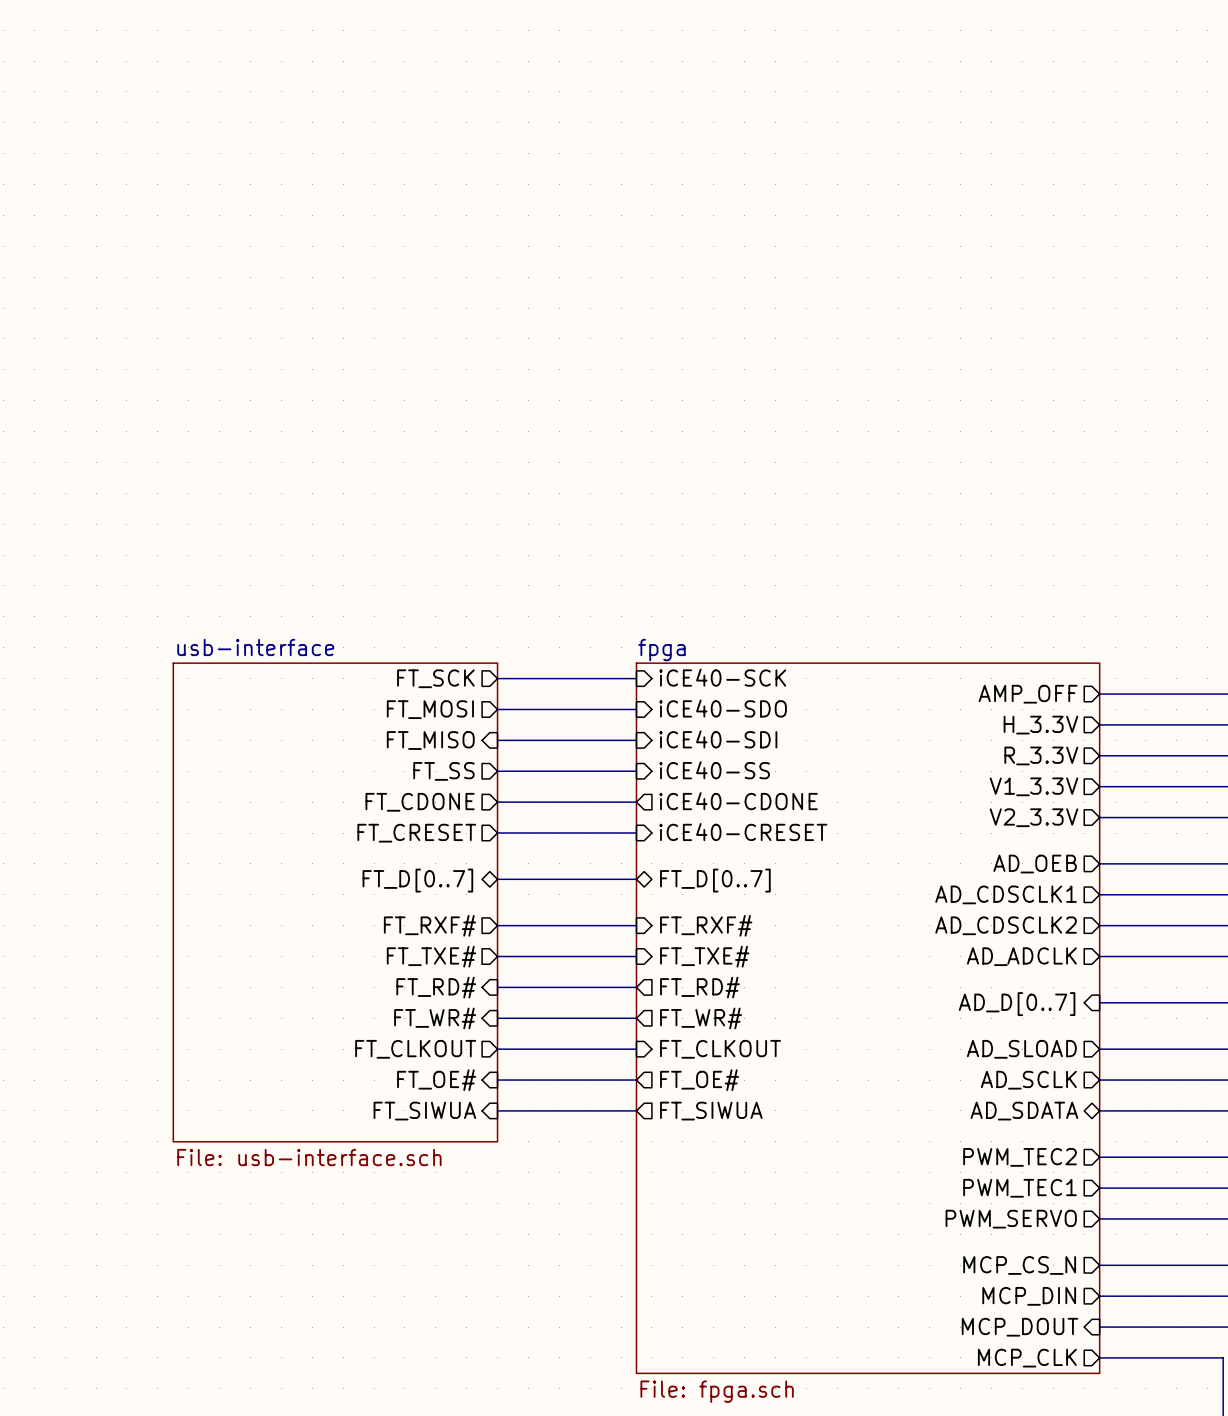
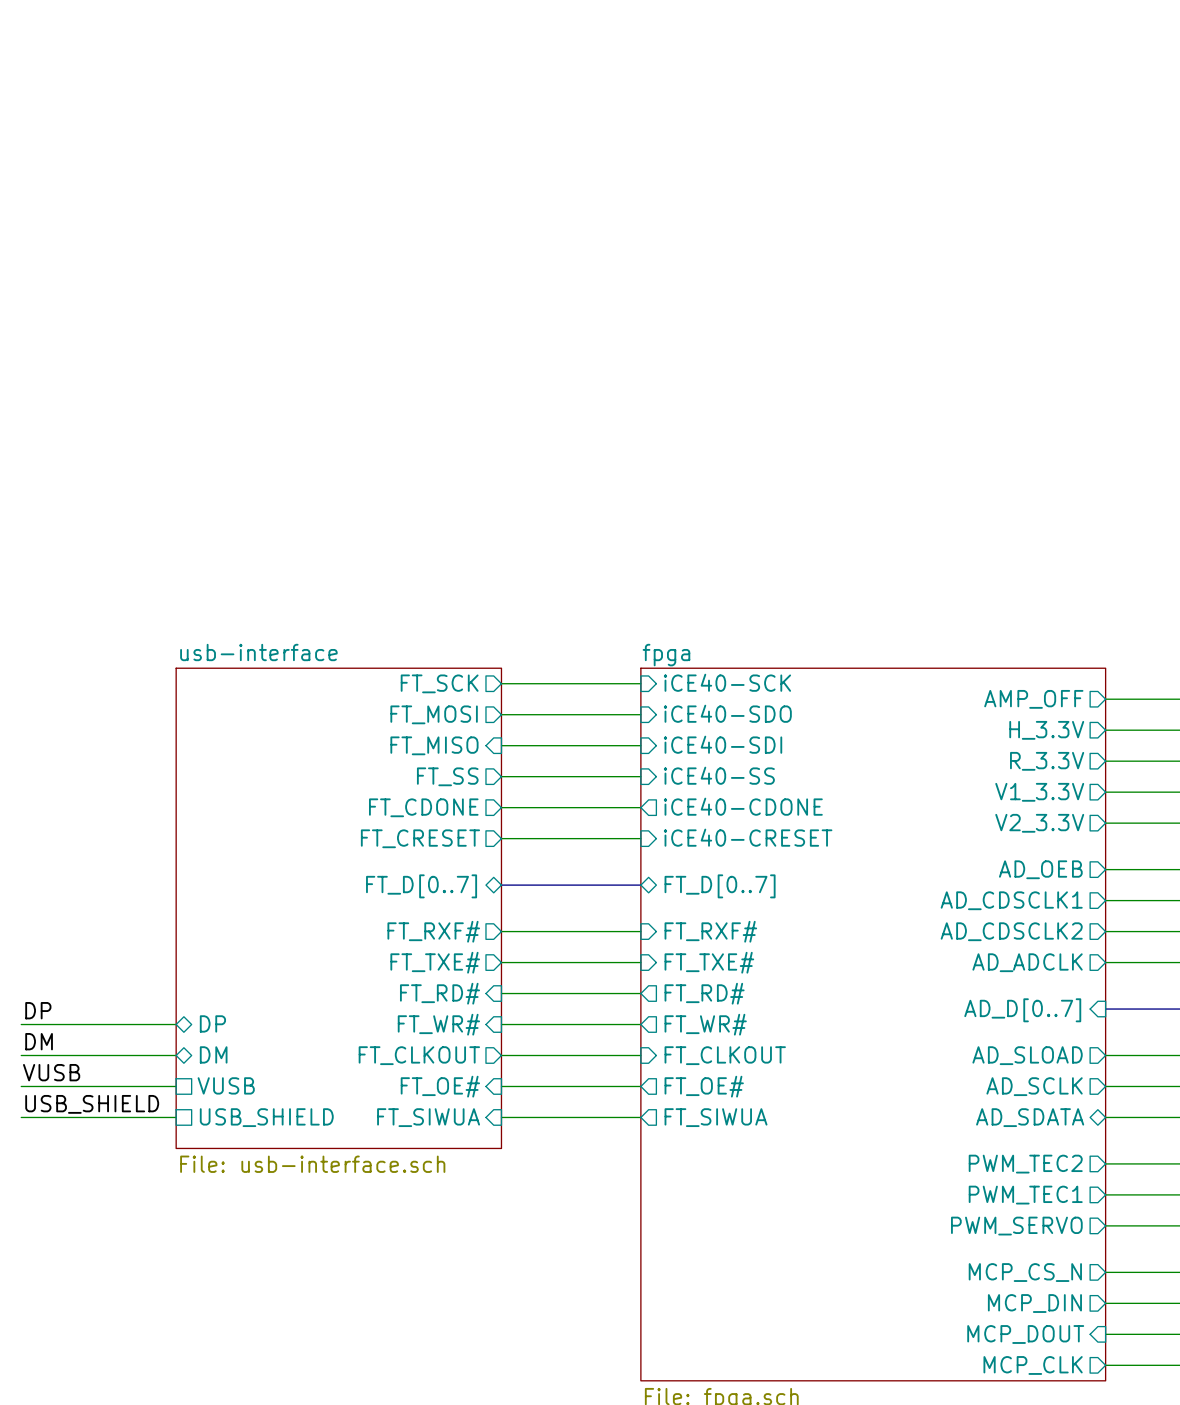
label: none -> DP (38, 1010)
sheet pin: none -> DP (212, 1023)
wire: none -> (21, 1024) (176, 1024)
label: none -> DM (39, 1041)
sheet pin: none -> DM (213, 1054)
wire: none -> (21, 1055) (176, 1055)
label: none -> VUSB (51, 1072)
sheet pin: none -> VUSB (226, 1085)
wire: none -> (21, 1086) (176, 1086)
label: none -> USB_SHIELD (92, 1104)
wire: none -> (21, 1117) (176, 1117)
sheet pin: none -> USB_SHIELD (266, 1117)

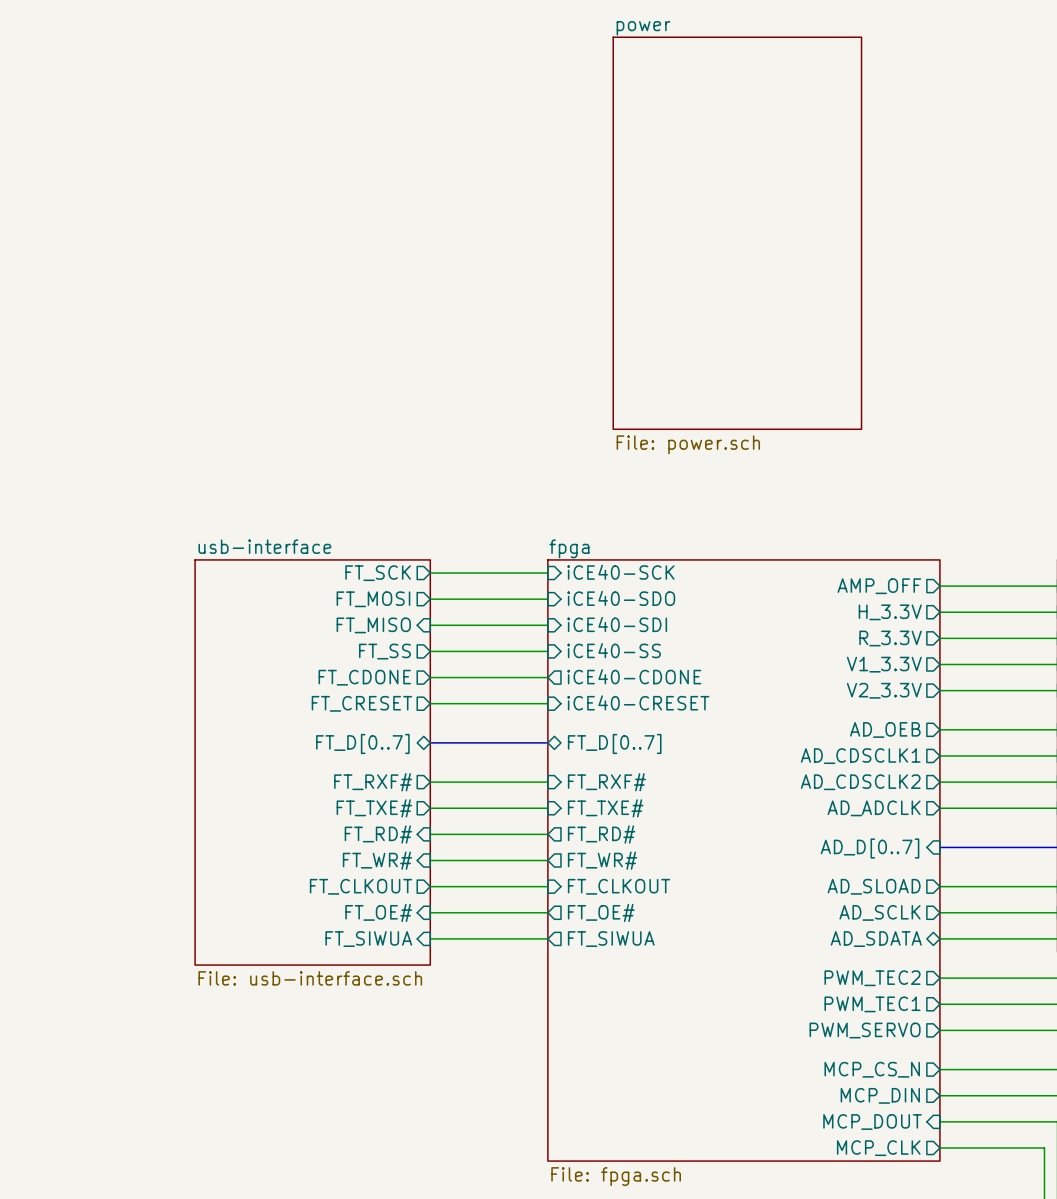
sheet power: none -> File: power.sch (737, 233)
sheet usb-interface: File: usb-interface.sch (338, 908) -> none
sheet usb-interface: none -> File: usb-interface.sch (312, 762)
label: DP (38, 1010) -> none
sheet pin: DP (212, 1023) -> none
wire: (21, 1024) (176, 1024) -> none
label: DM (39, 1041) -> none
sheet pin: DM (213, 1054) -> none
wire: (21, 1055) (176, 1055) -> none
label: VUSB (51, 1072) -> none
sheet pin: VUSB (226, 1085) -> none
wire: (21, 1086) (176, 1086) -> none
label: USB_SHIELD (92, 1104) -> none
wire: (21, 1117) (176, 1117) -> none
sheet pin: USB_SHIELD (266, 1117) -> none

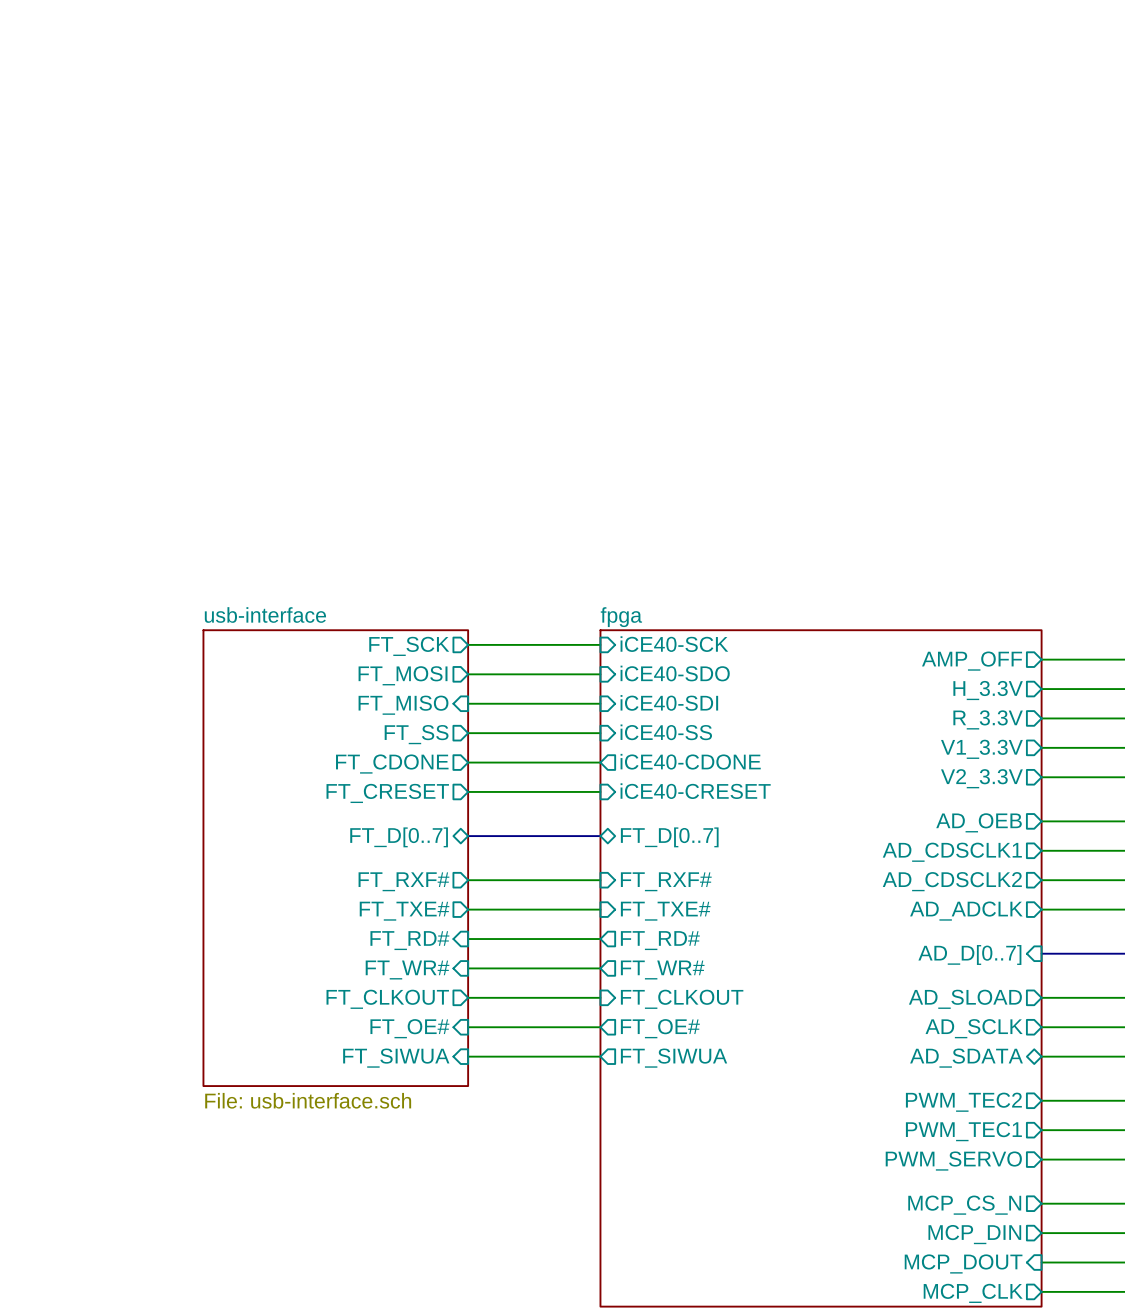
sheet power: File: power.sch (737, 233) -> none

